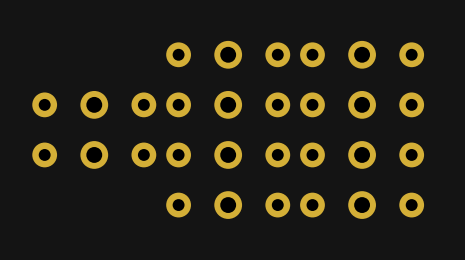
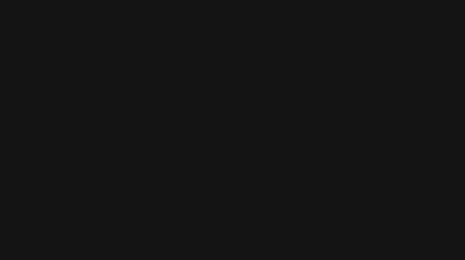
part: (228, 54) -> none
part: (362, 54) -> none
part: (94, 104) -> none
part: (228, 104) -> none
part: (362, 104) -> none
part: (94, 154) -> none
part: (228, 154) -> none
part: (362, 154) -> none
part: (228, 205) -> none
part: (362, 205) -> none

